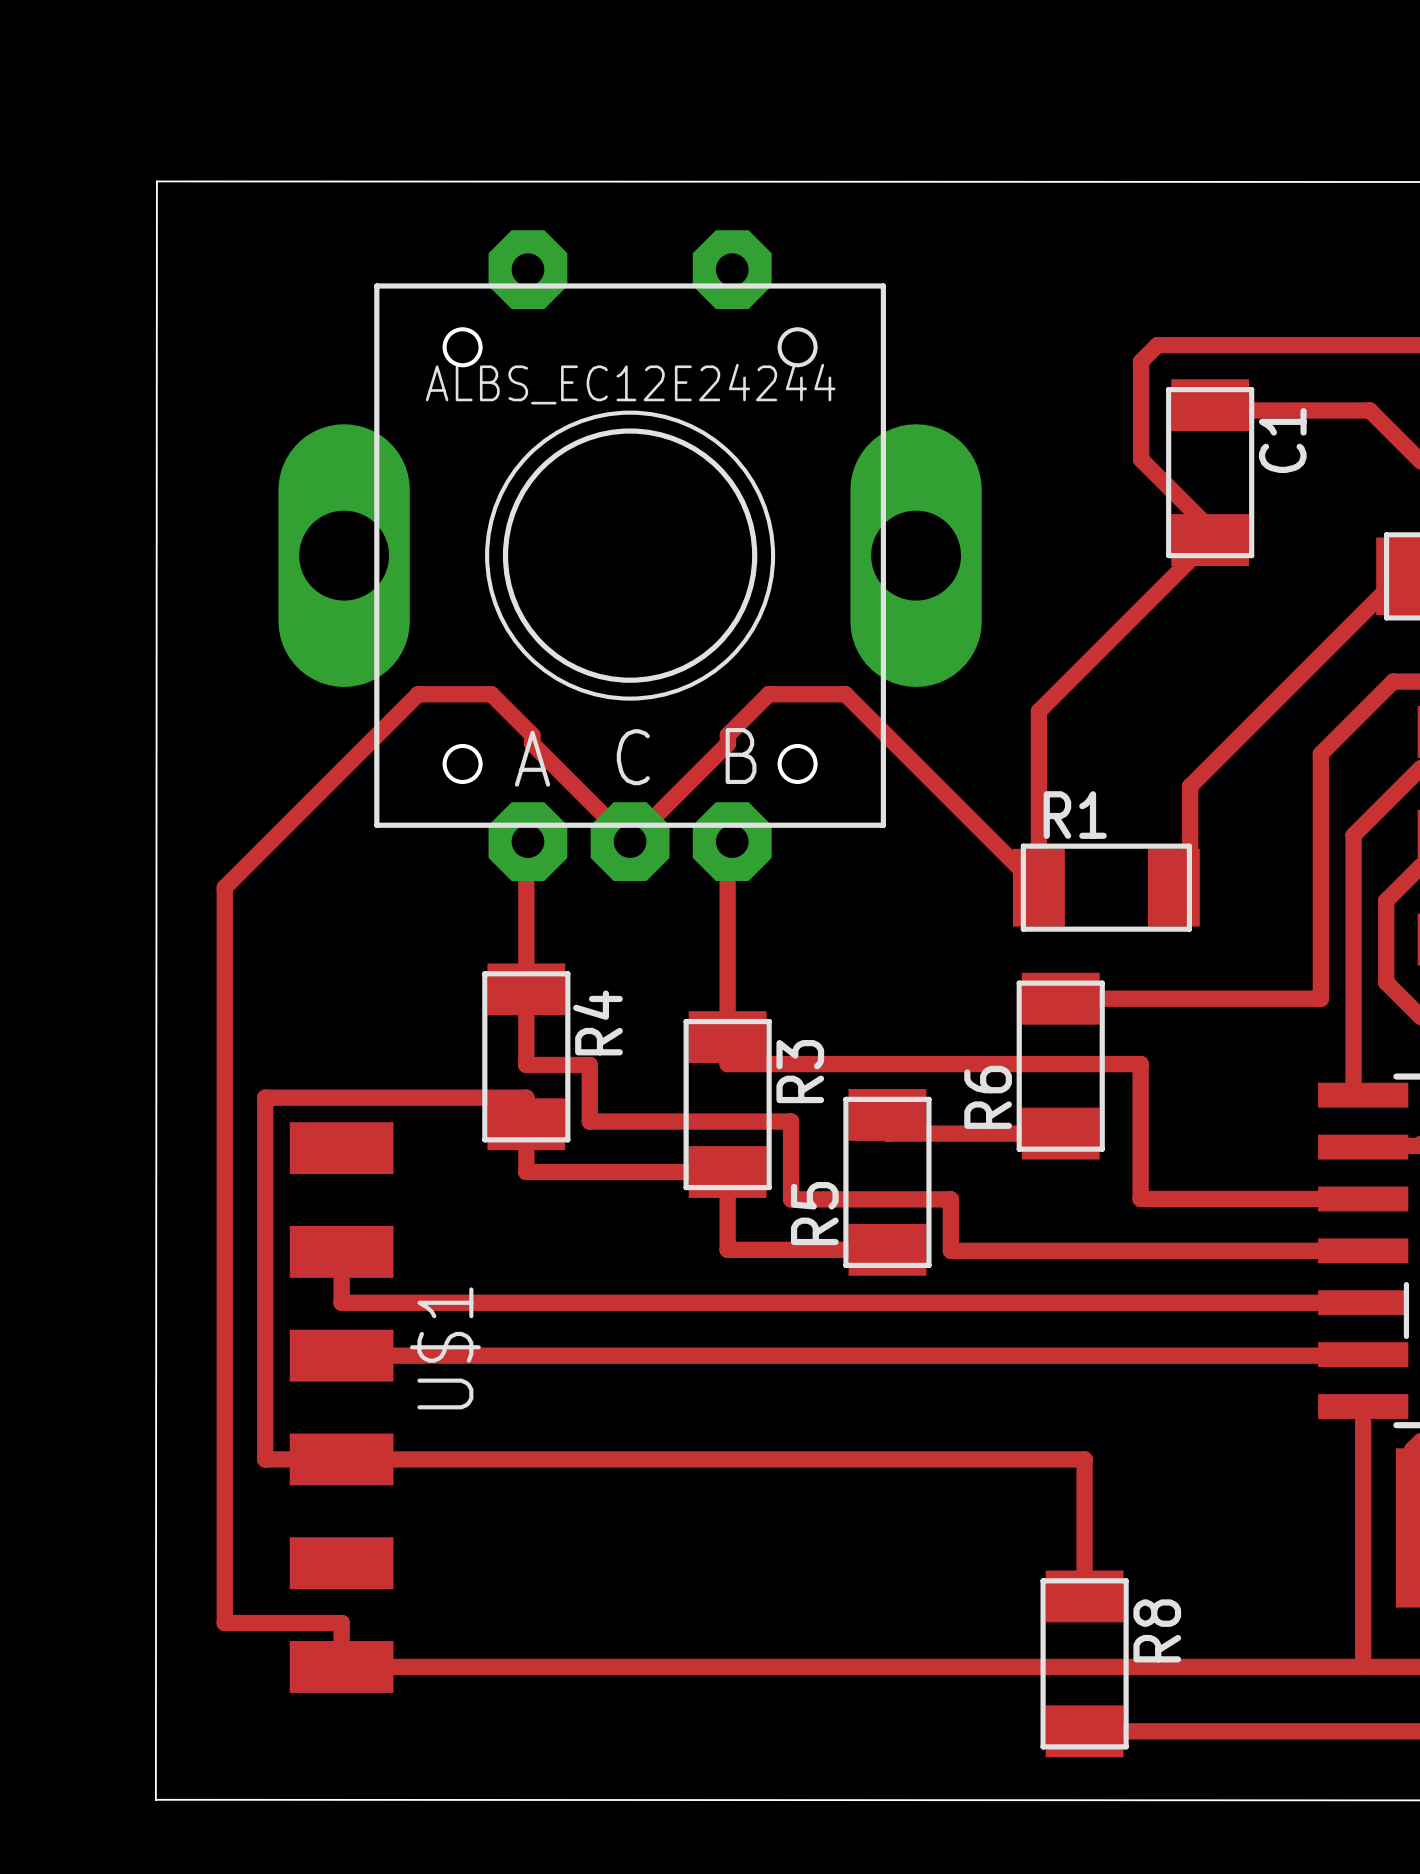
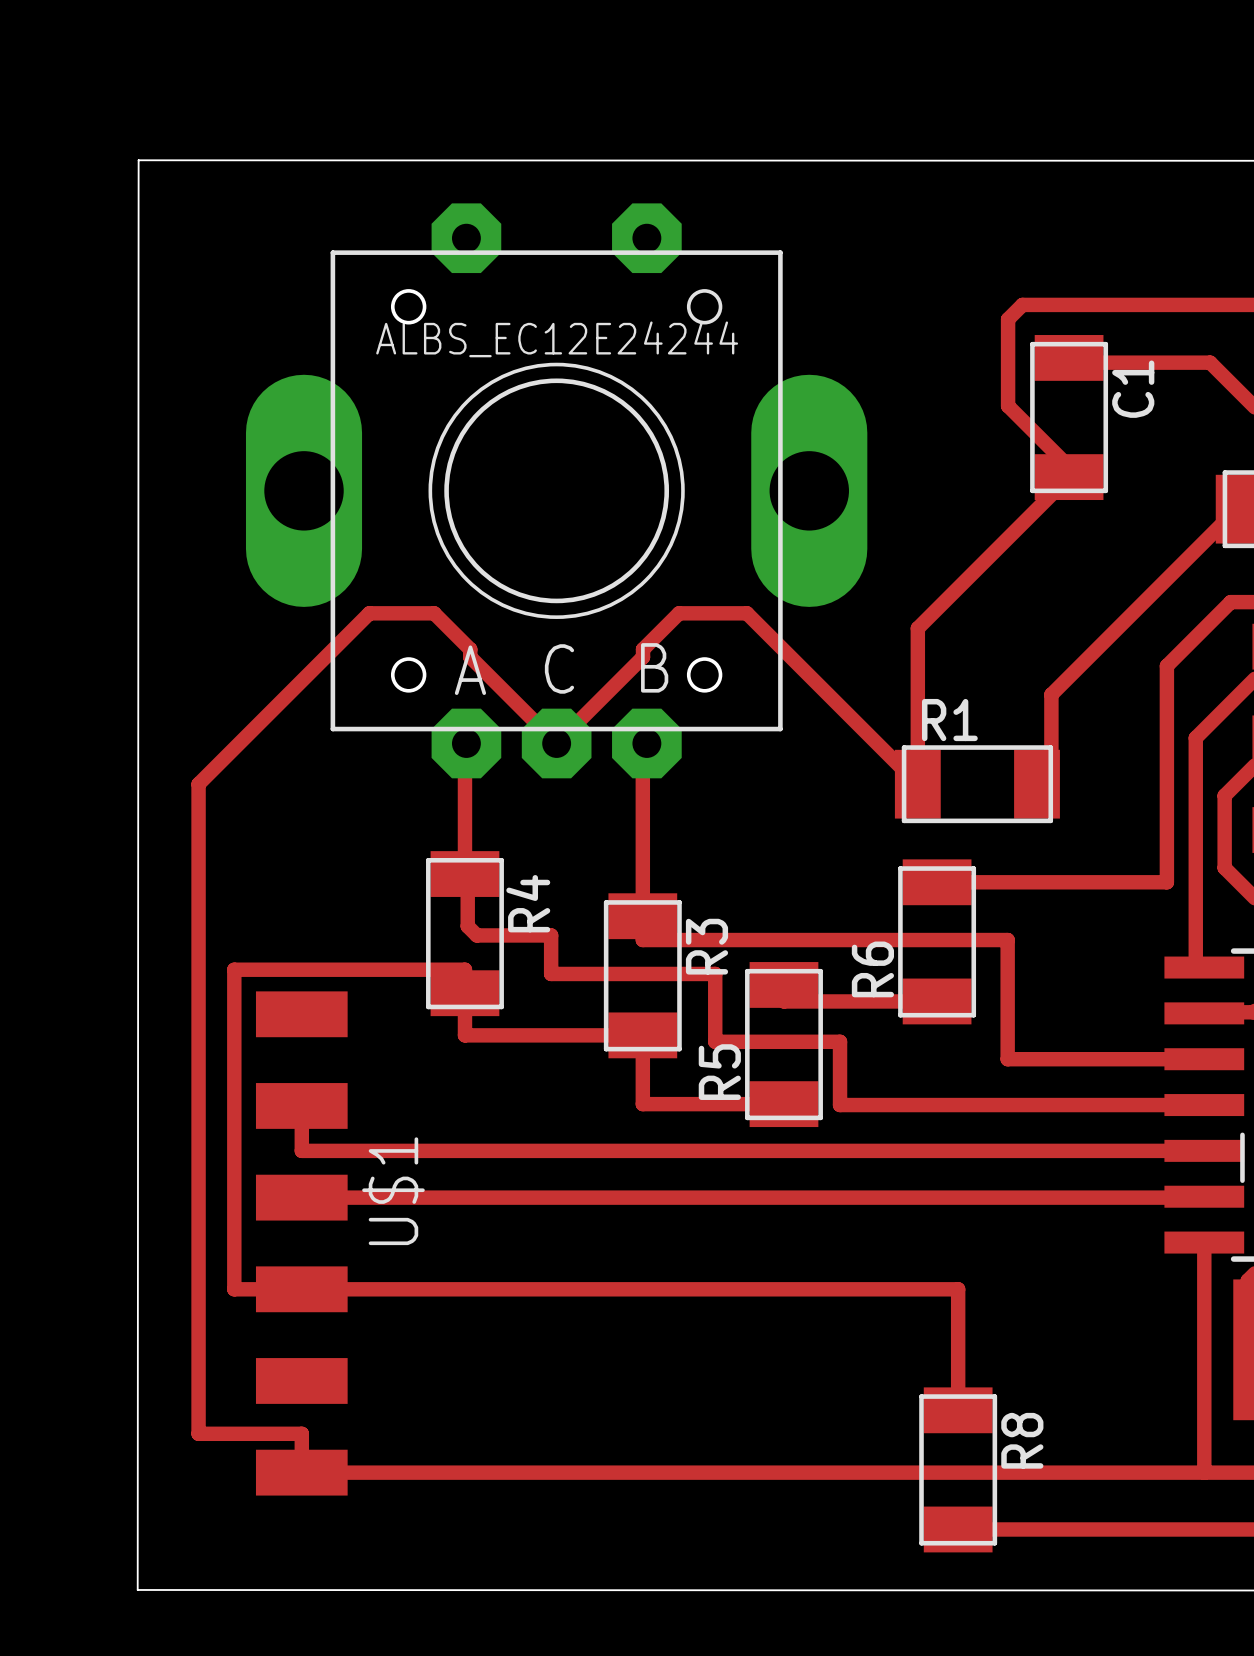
track: (526, 989) (526, 1065) (589, 1065) (589, 1121) (791, 1121) (791, 1199) (950, 1199) -> (464, 874) (467, 876) (467, 926) (476, 935) (551, 935) (551, 973) (715, 973) (715, 1041) (840, 1041) (840, 1059)

